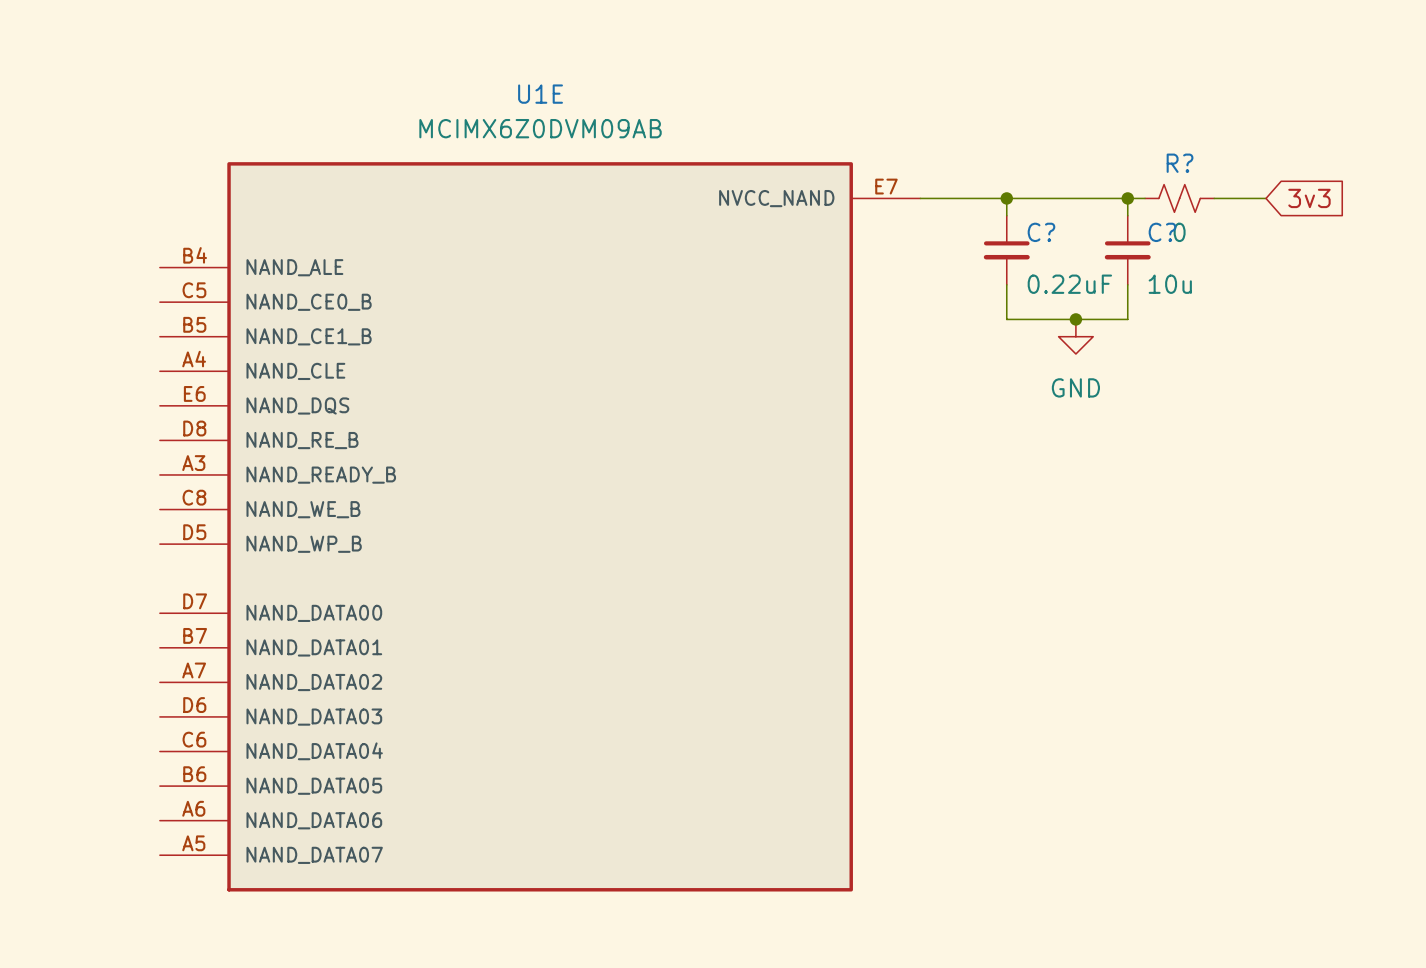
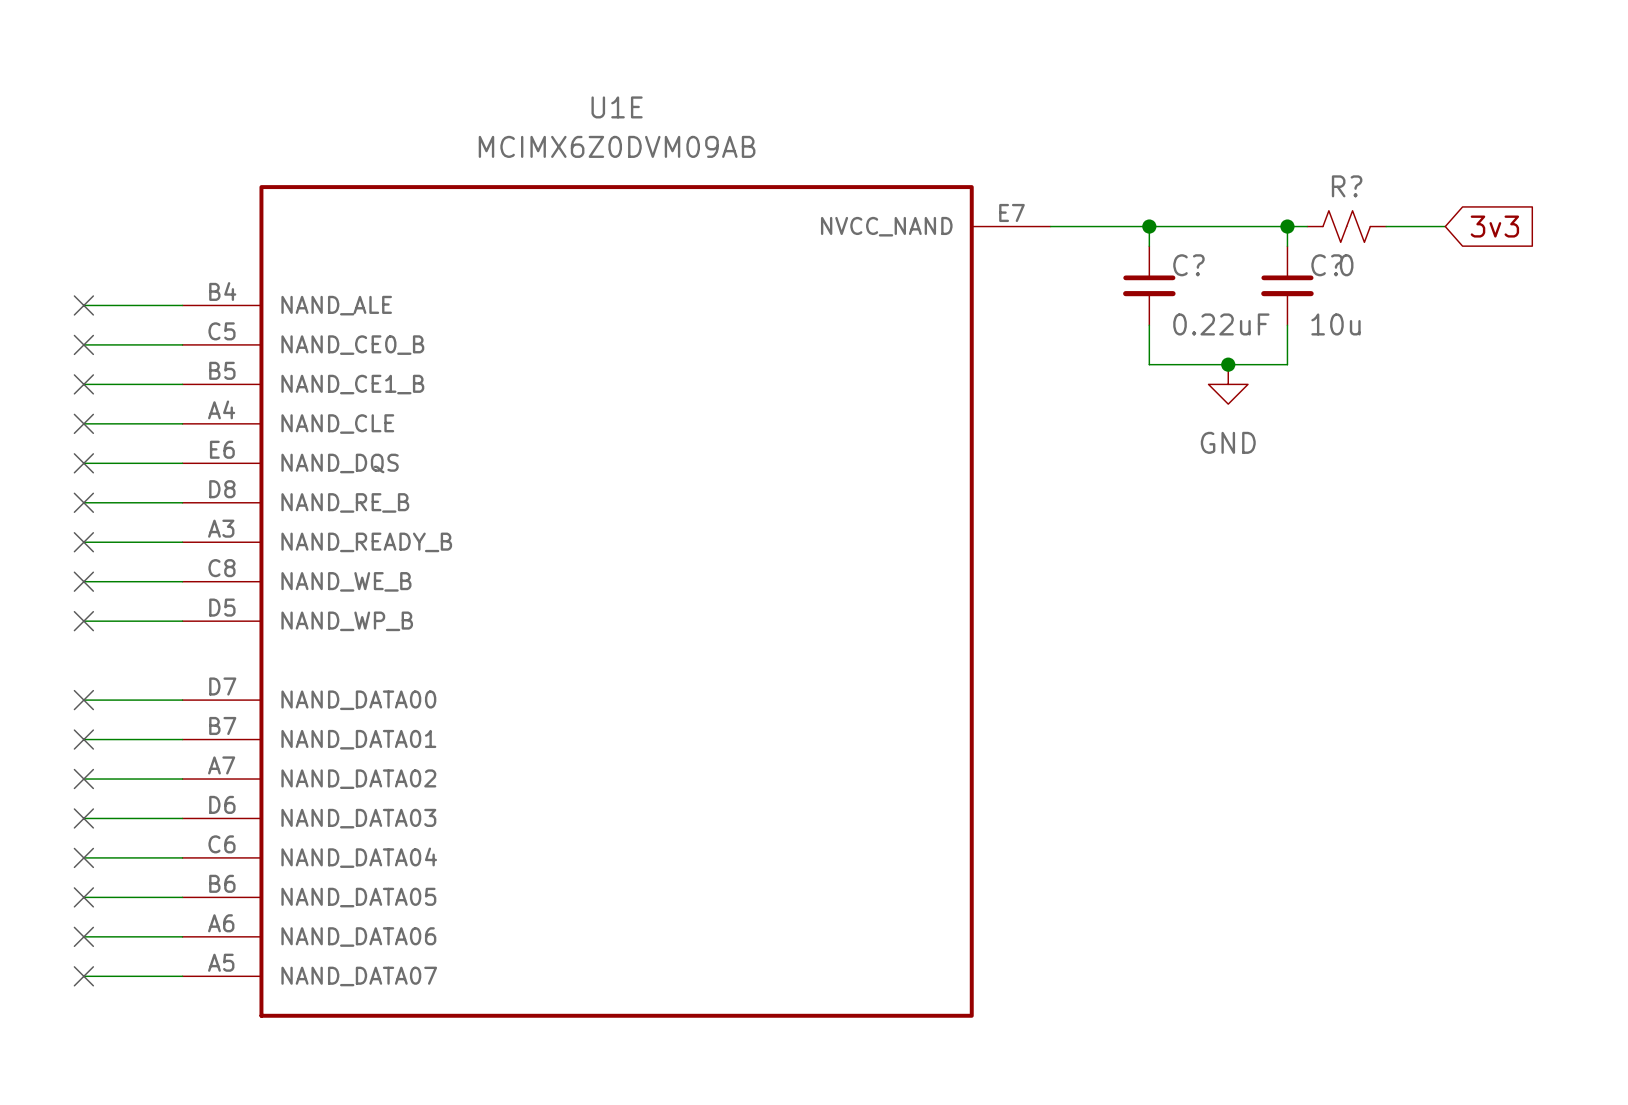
wire: none -> (83, 305) (182, 305)
no-connect mark: none -> (83, 305)
wire: none -> (83, 344) (182, 344)
no-connect mark: none -> (83, 344)
wire: none -> (83, 384) (182, 384)
no-connect mark: none -> (83, 384)
wire: none -> (83, 423) (182, 423)
no-connect mark: none -> (83, 423)
wire: none -> (83, 463) (182, 463)
no-connect mark: none -> (83, 463)
wire: none -> (83, 502) (182, 502)
no-connect mark: none -> (83, 502)
wire: none -> (83, 542) (182, 542)
no-connect mark: none -> (83, 542)
wire: none -> (83, 581) (182, 581)
no-connect mark: none -> (83, 581)
wire: none -> (83, 621) (182, 621)
no-connect mark: none -> (83, 621)
wire: none -> (83, 700) (182, 700)
no-connect mark: none -> (83, 700)
wire: none -> (83, 739) (182, 739)
no-connect mark: none -> (83, 739)
wire: none -> (83, 779) (182, 779)
no-connect mark: none -> (83, 779)
wire: none -> (83, 818) (182, 818)
no-connect mark: none -> (83, 818)
wire: none -> (83, 857) (182, 857)
no-connect mark: none -> (83, 857)
wire: none -> (83, 897) (182, 897)
no-connect mark: none -> (83, 897)
wire: none -> (83, 936) (182, 936)
no-connect mark: none -> (83, 936)
wire: none -> (83, 976) (182, 976)
no-connect mark: none -> (83, 976)

